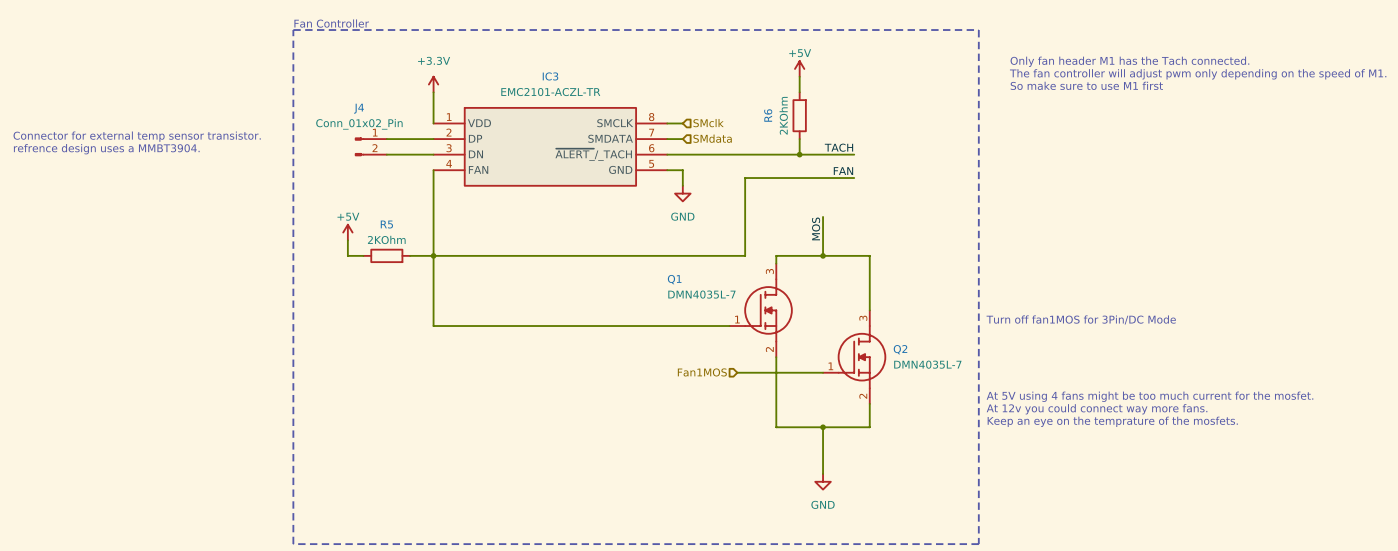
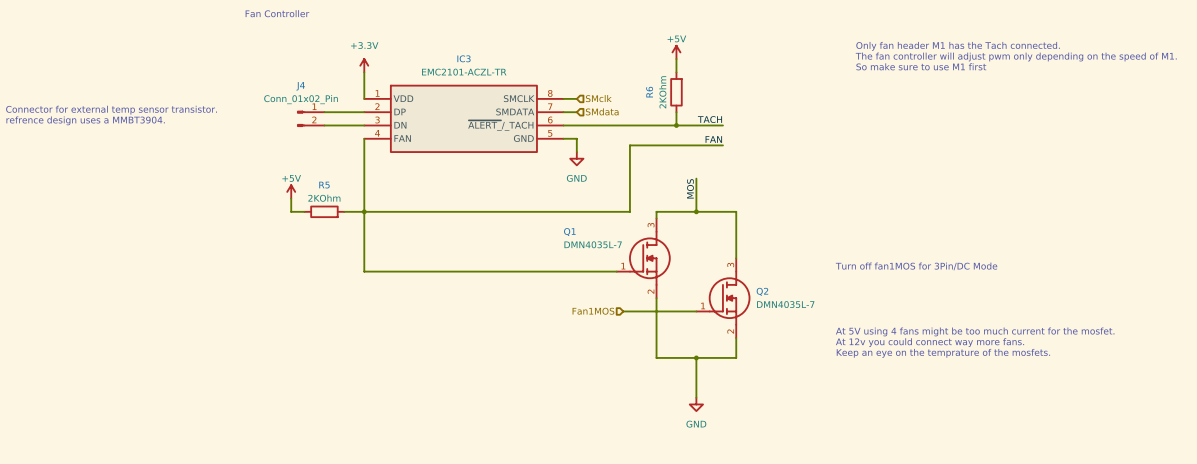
line: (293, 30) (978, 30) (978, 544) (293, 544) (293, 30) -> none

